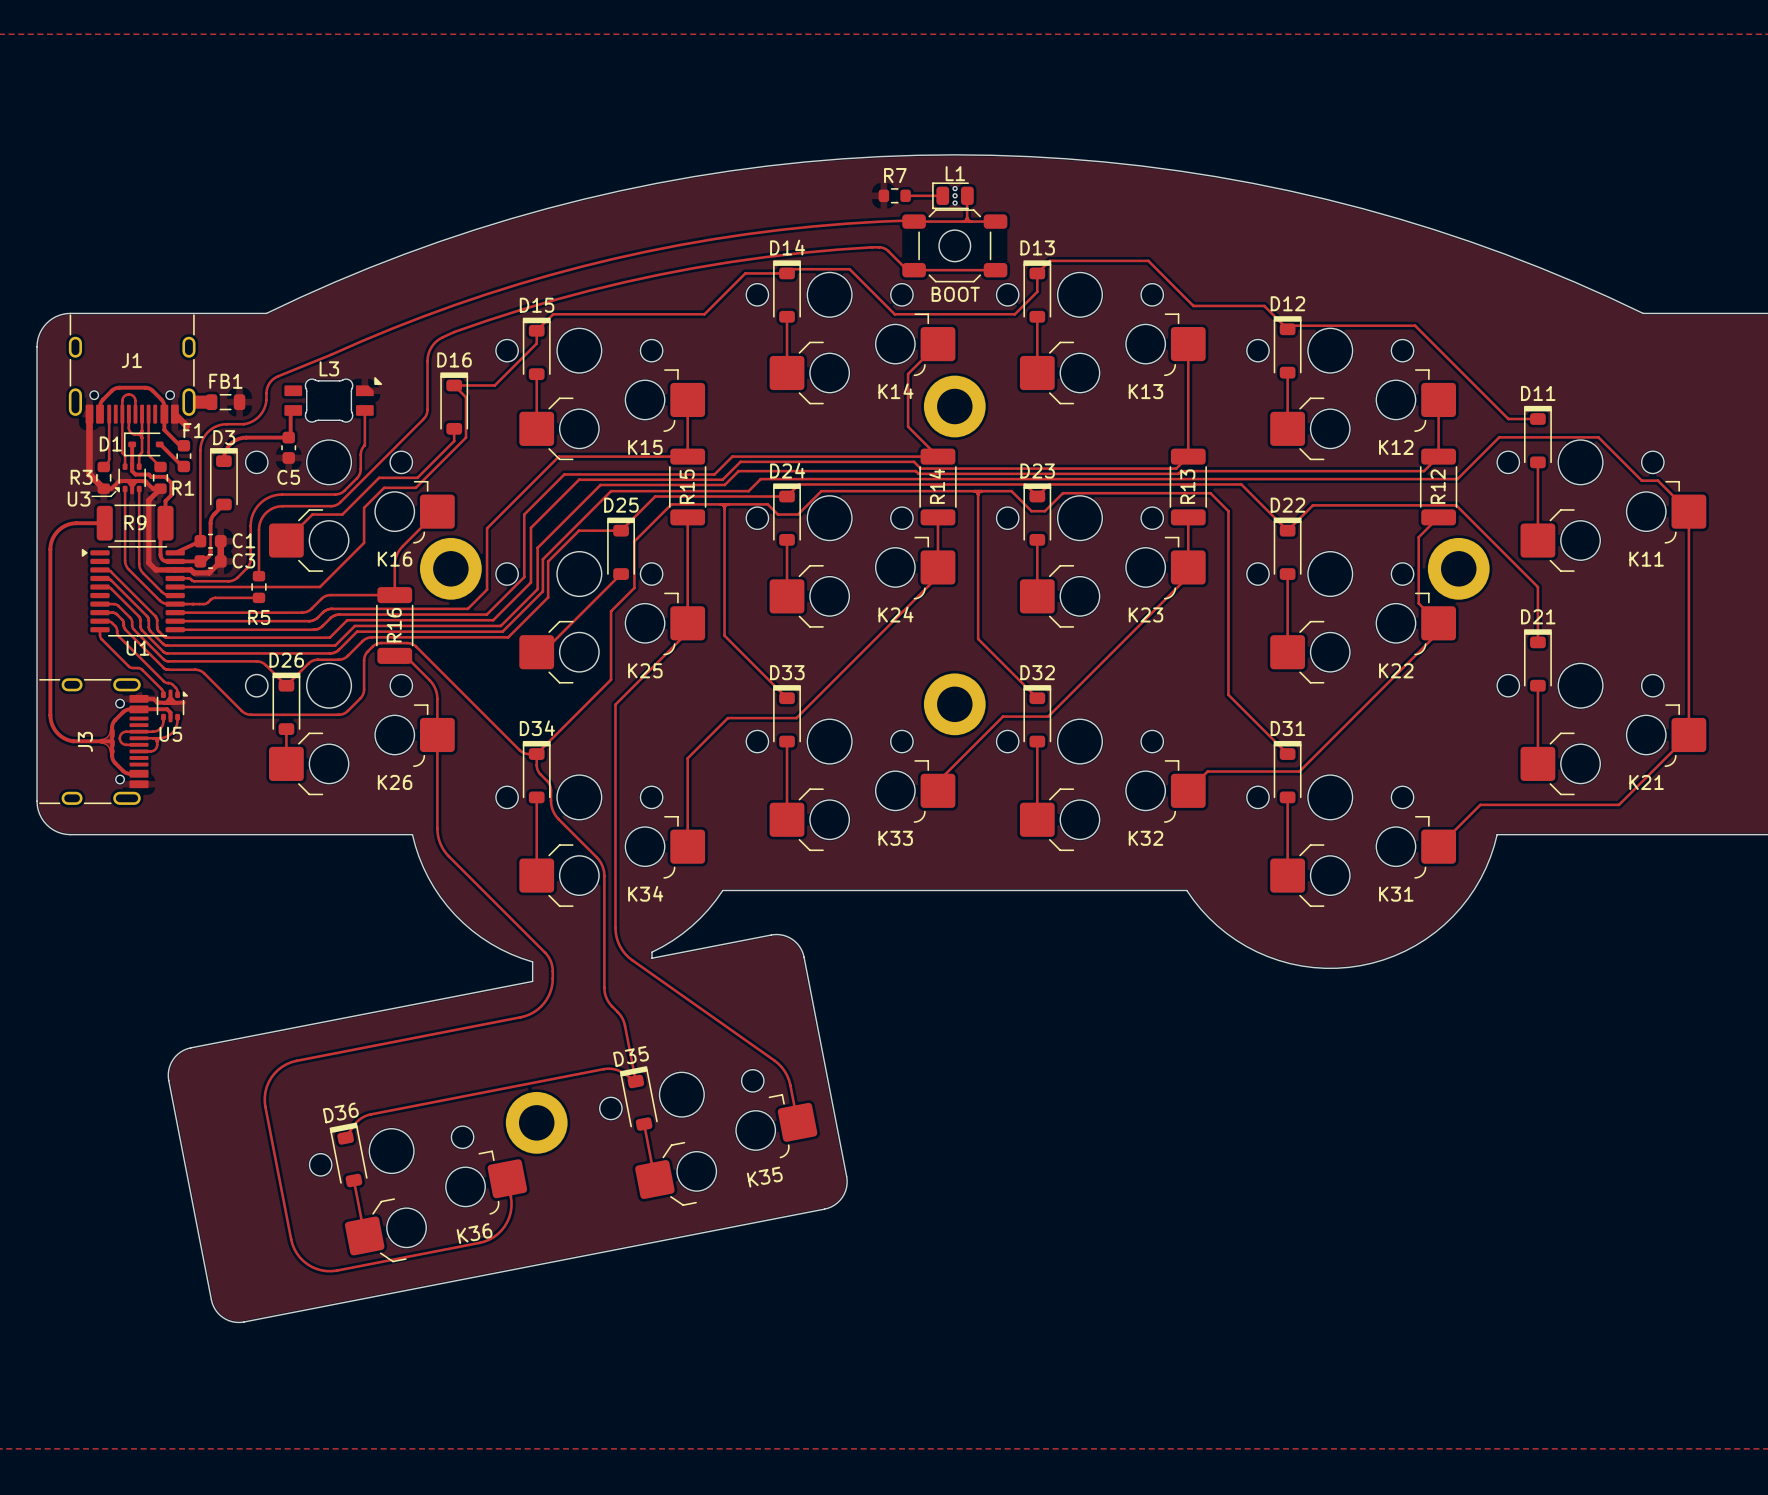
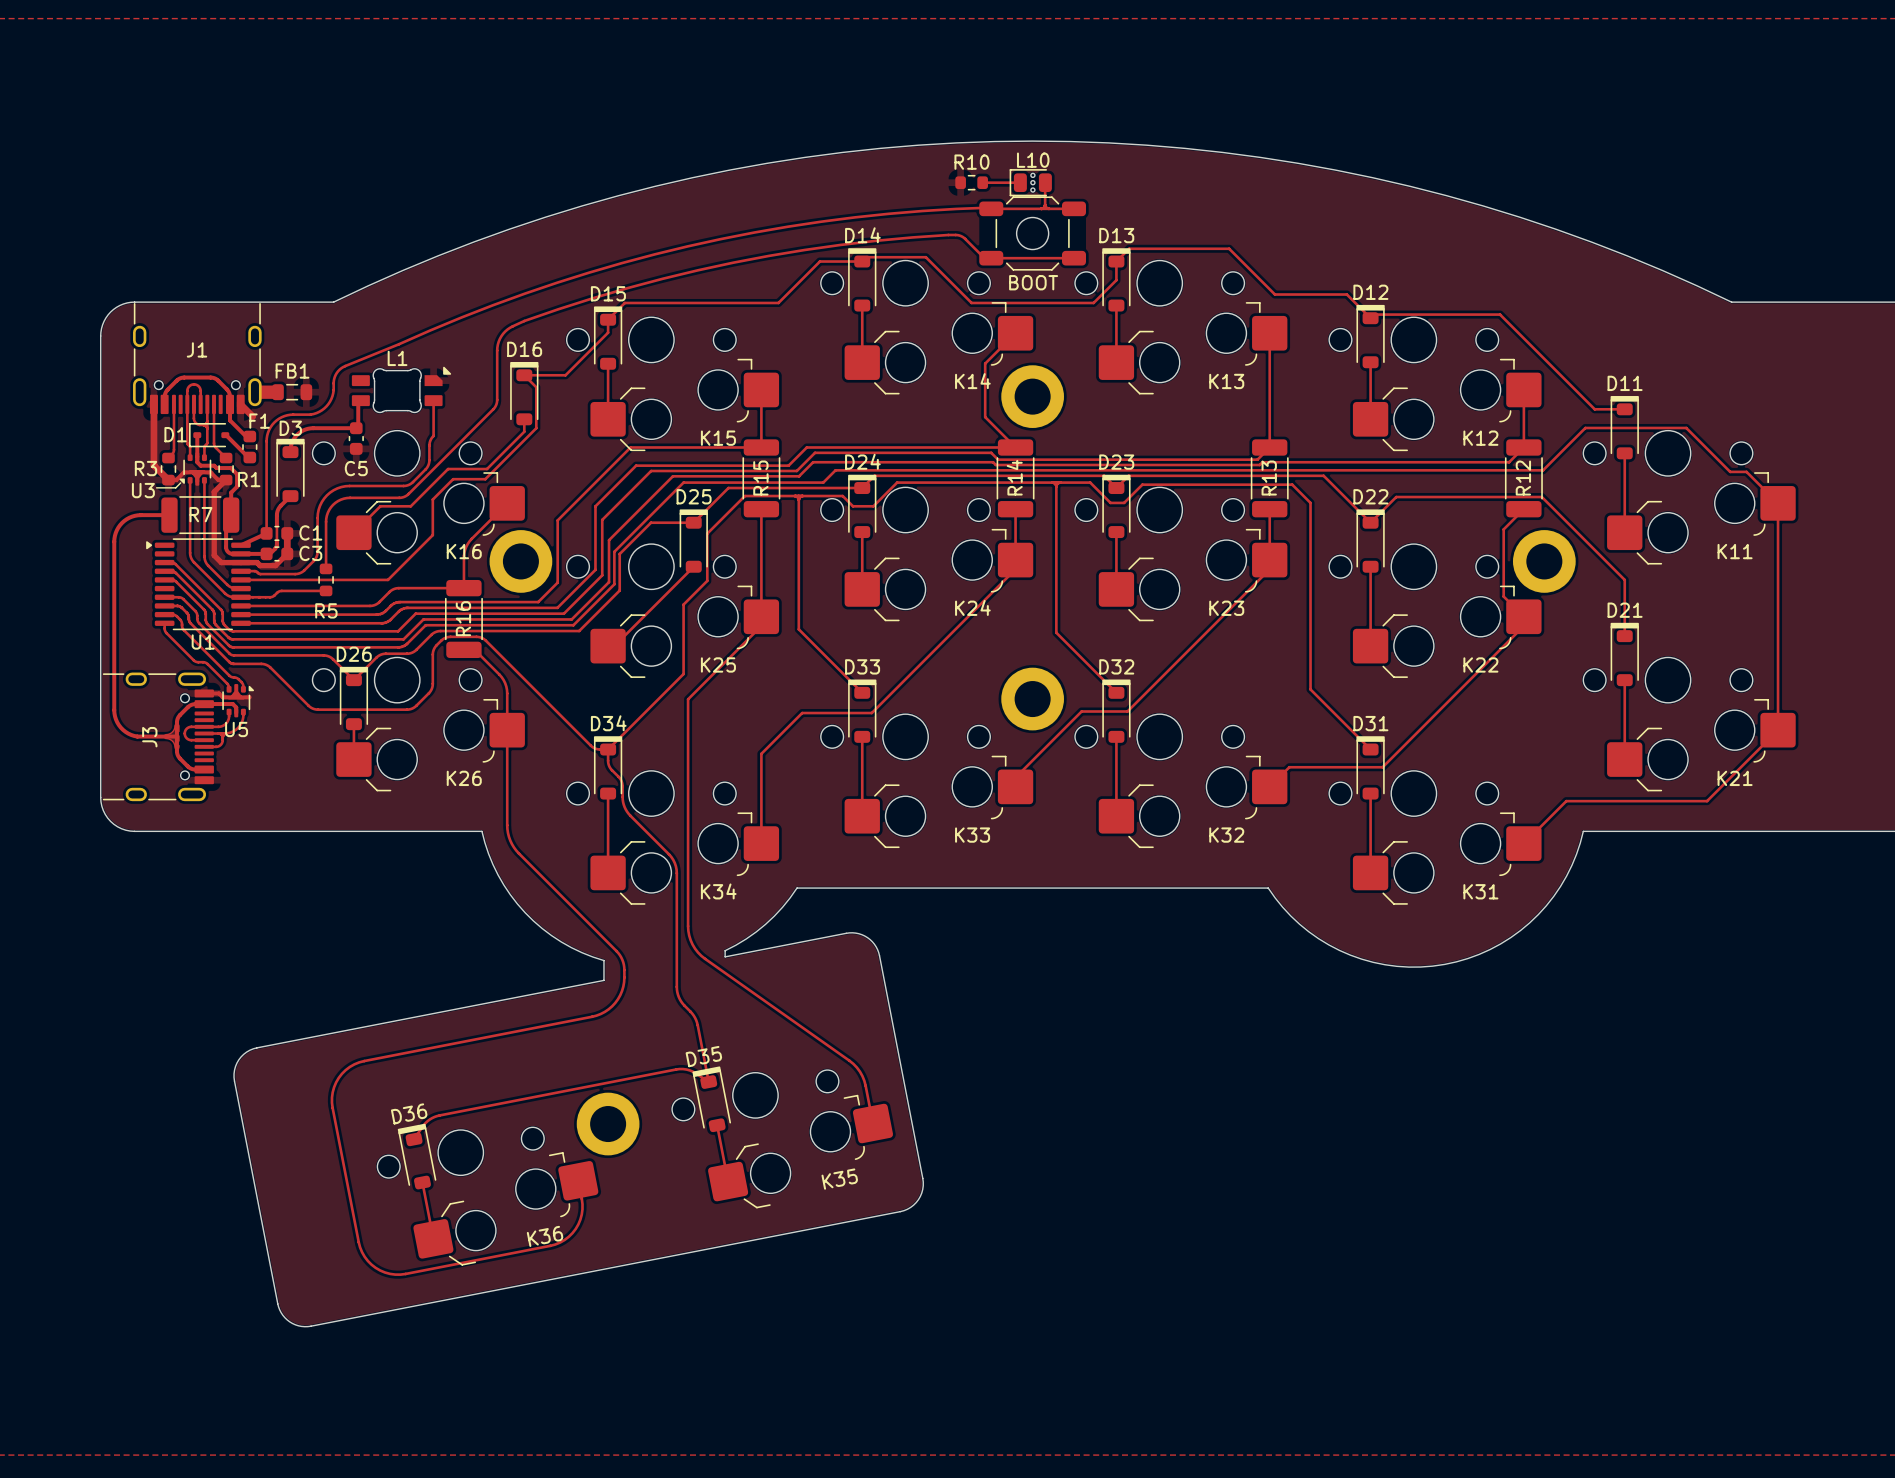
L1 name: L1 (955, 173) -> L10 (1033, 160)
R7 name: R7 (895, 175) -> R10 (971, 162)
L3 name: L3 (329, 368) -> L1 (397, 358)
R9 name: R9 (135, 522) -> R7 (200, 514)

